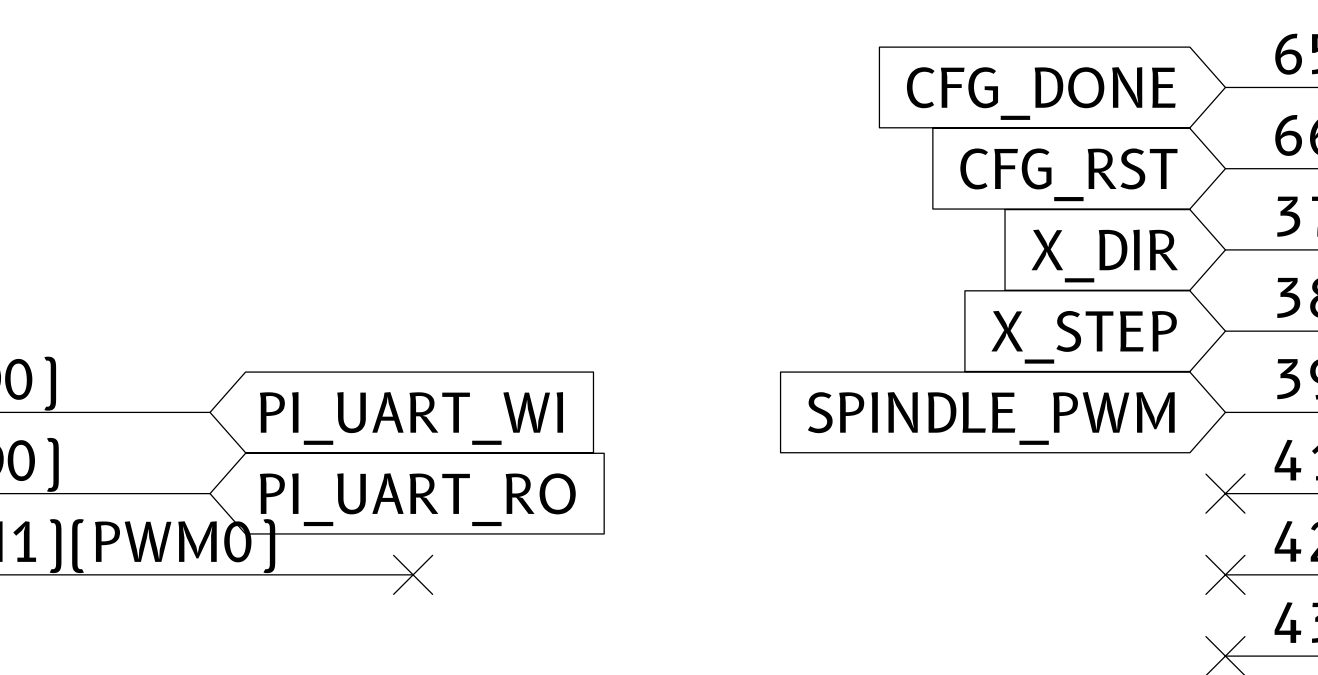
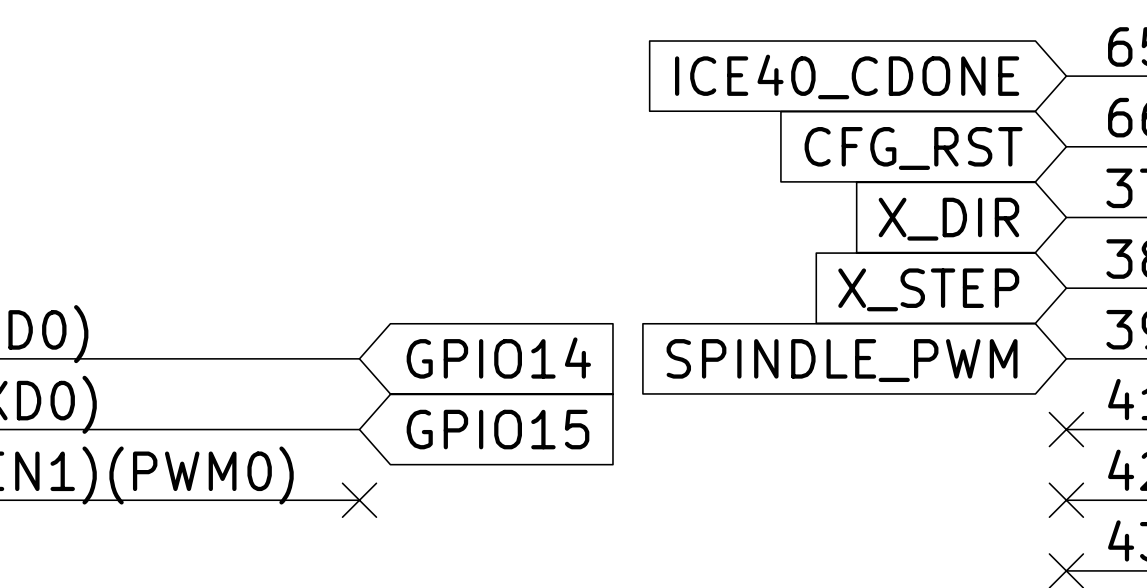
global label: CFG_DONE (1041, 93) -> ICE40_CDONE (847, 76)
wire: none -> (182, 358) (359, 358)
global label: none -> GPIO14 (498, 358)
global label: PI_UART_WI (411, 418) -> none
wire: none -> (182, 429) (359, 429)
global label: none -> GPIO15 (497, 429)
global label: PI_UART_RO (417, 499) -> none

